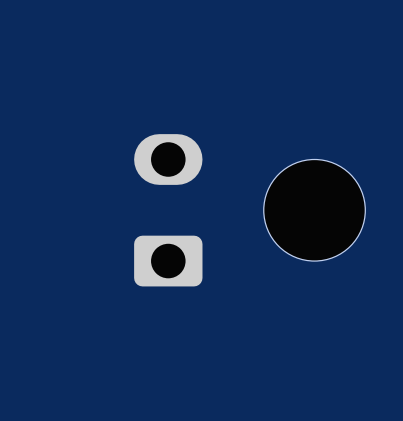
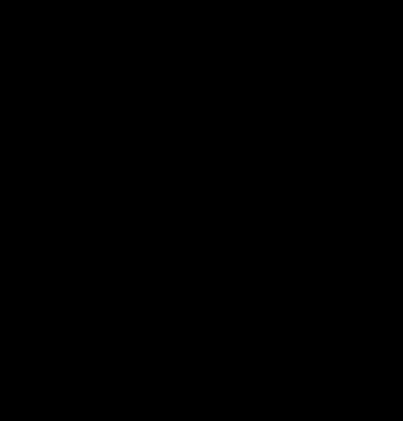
part: (249, 210) -> none

